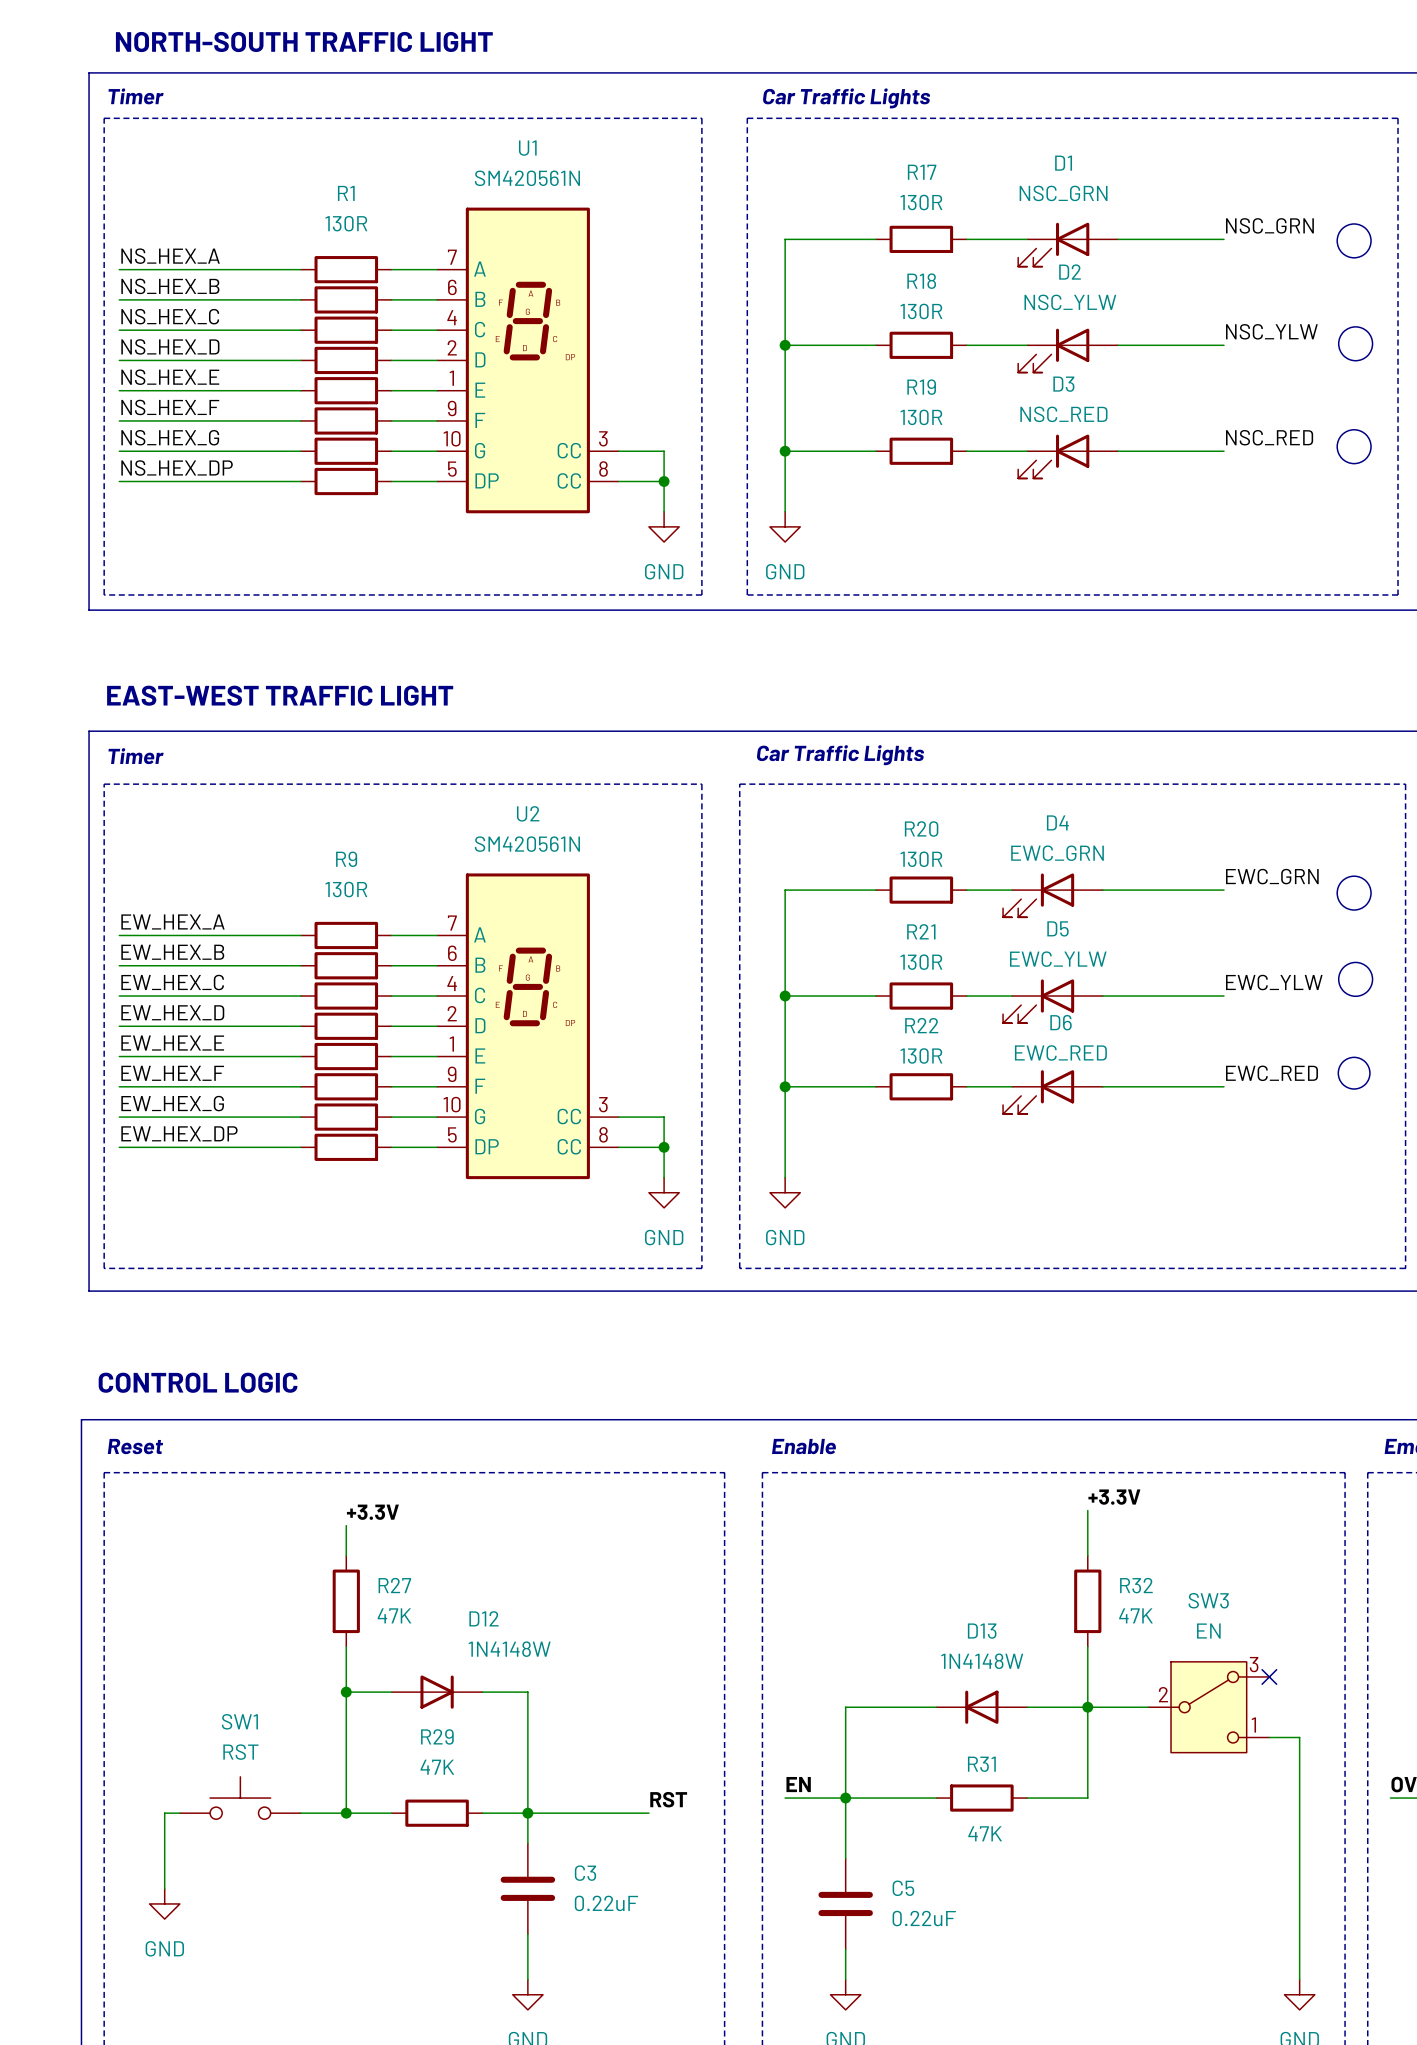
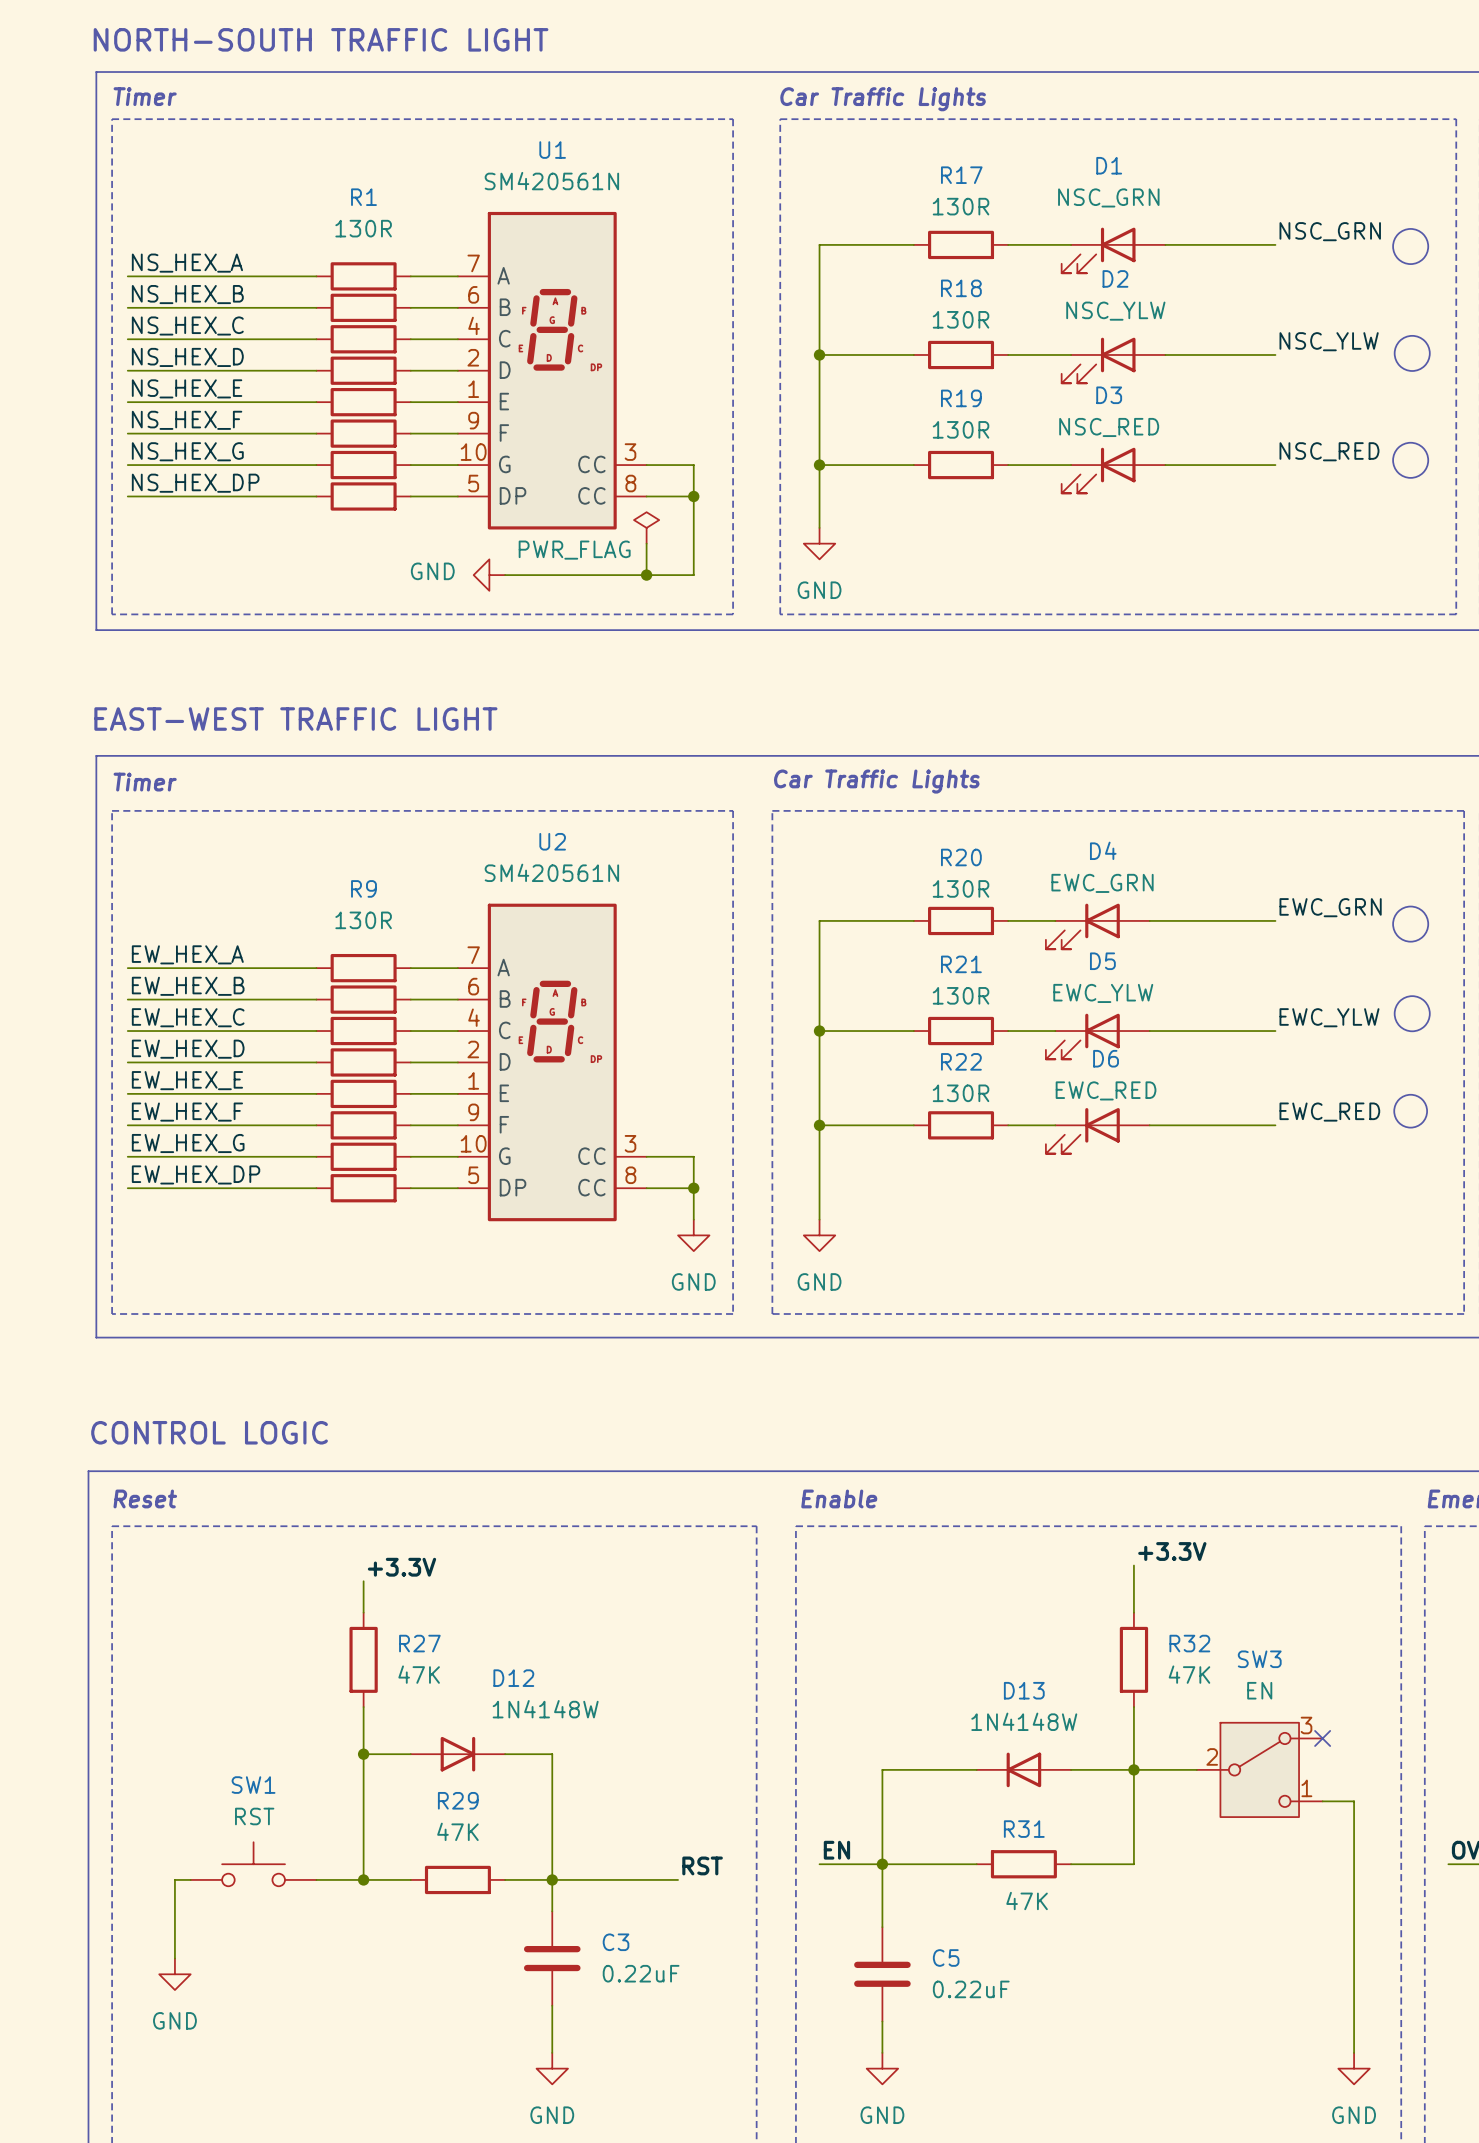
power symbol: none -> PWR_FLAG (646, 527)
wire: none -> (693, 527) (693, 575) (505, 575)
wire: none -> (646, 543) (646, 575)
power symbol rotation: 0° (664, 526) -> 90° clockwise (489, 575)
power symbol position: GND (664, 526) -> GND (489, 575)
junction: none -> (646, 575)

